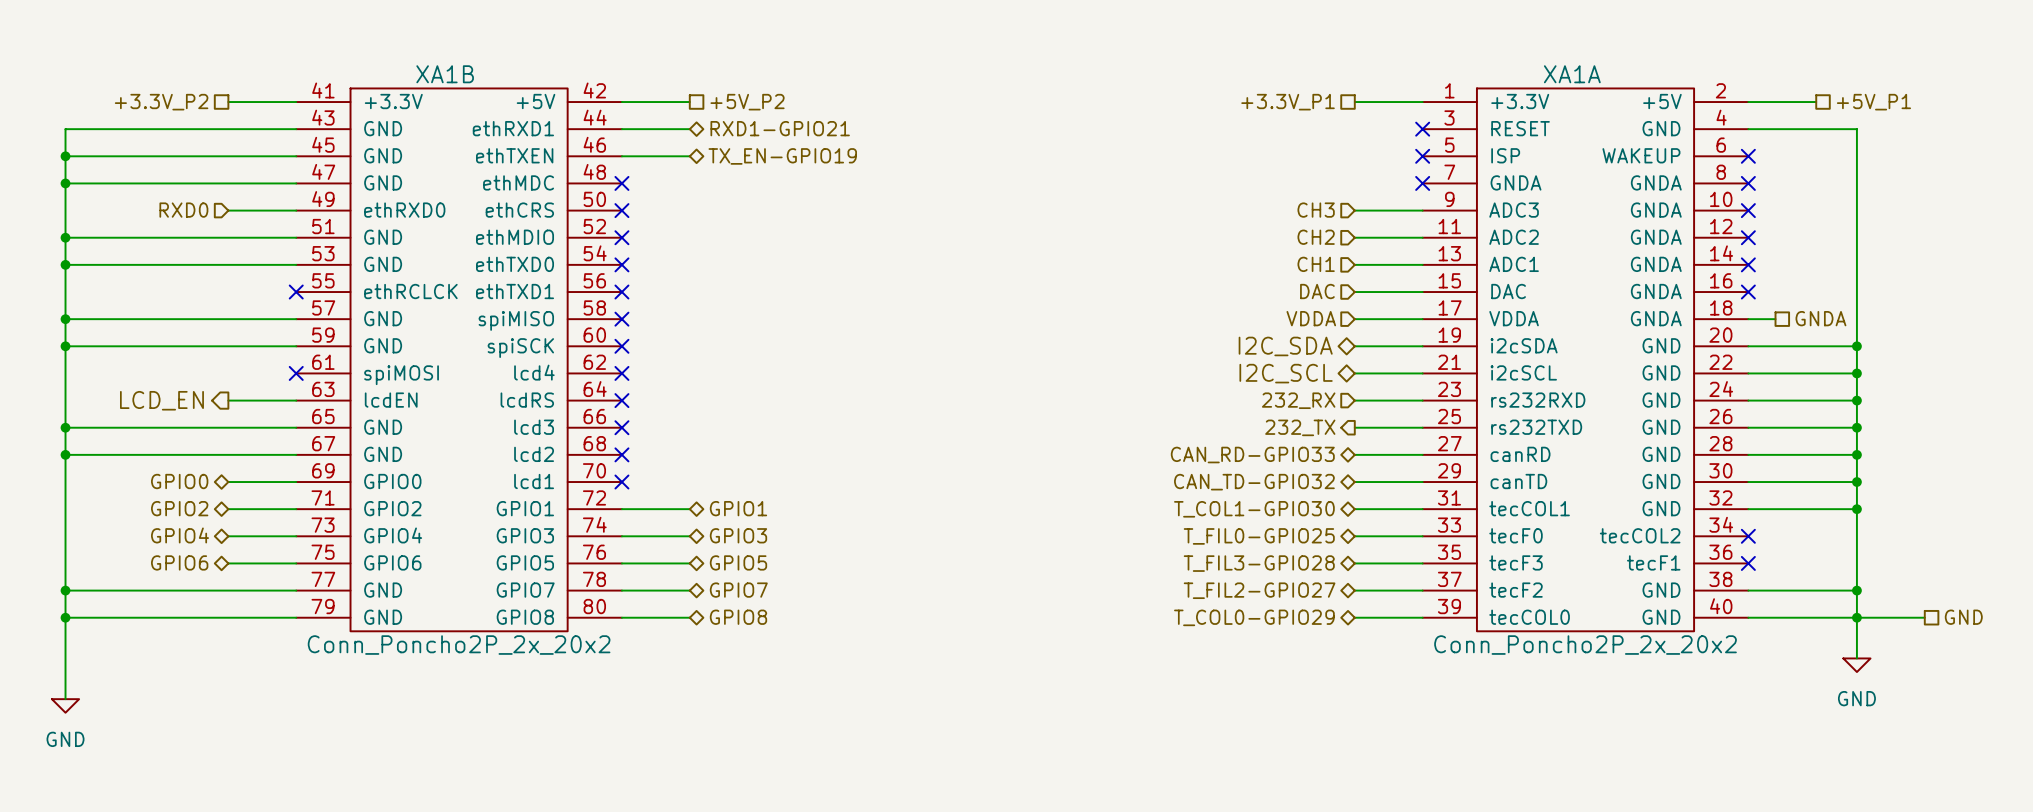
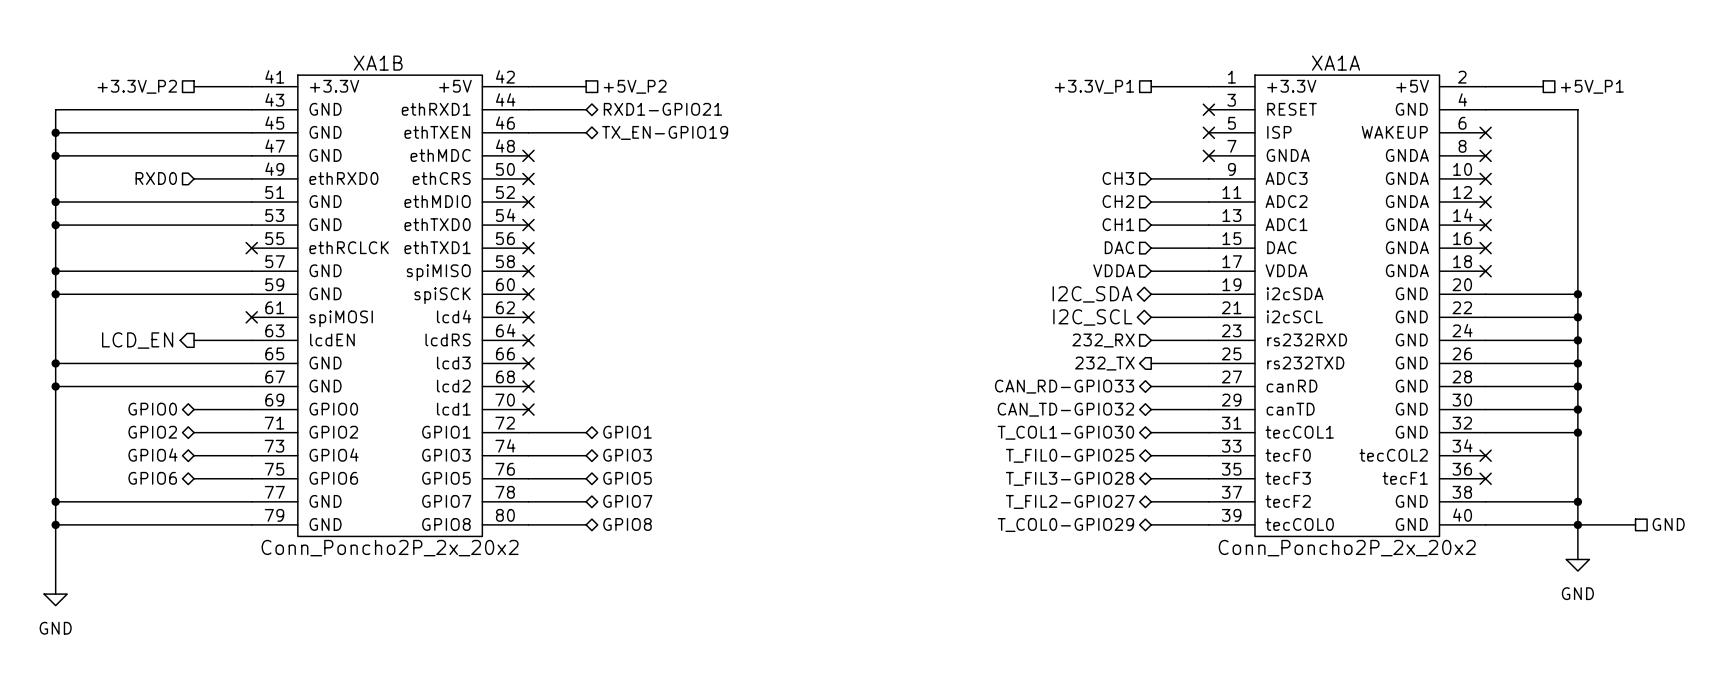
hierarchical label: GNDA (1820, 318) -> none
wire: (1748, 319) (1775, 319) -> none
no-connect mark: none -> (1485, 271)

